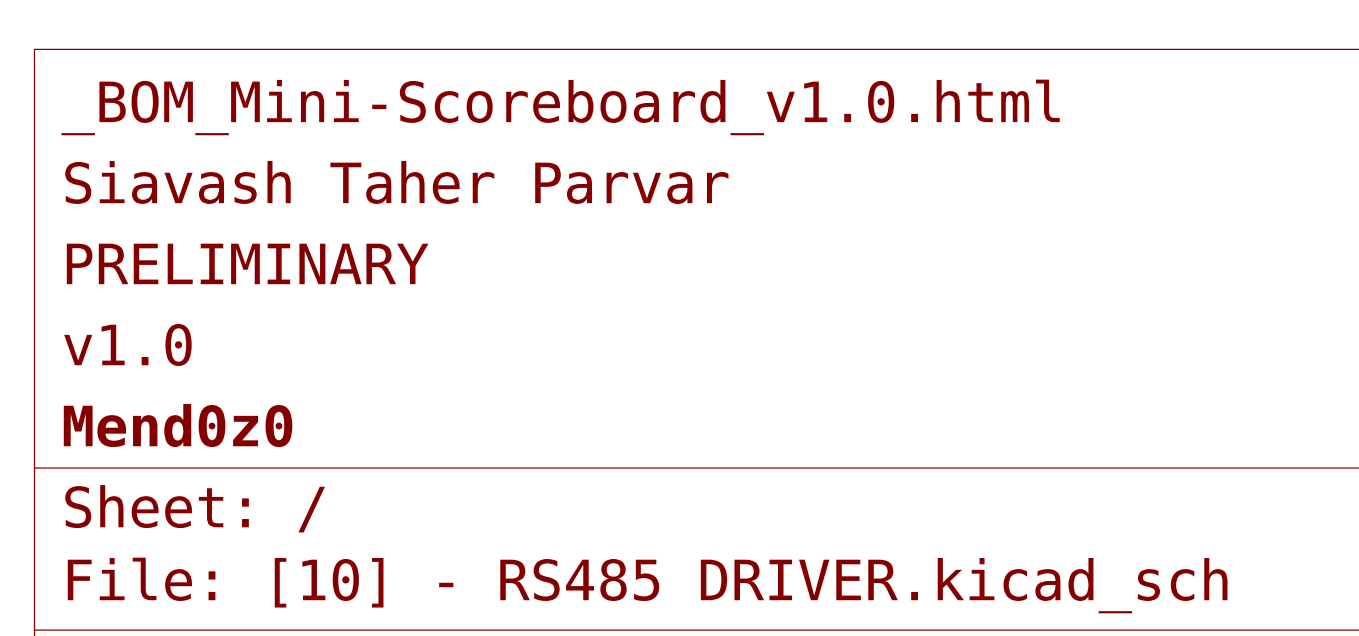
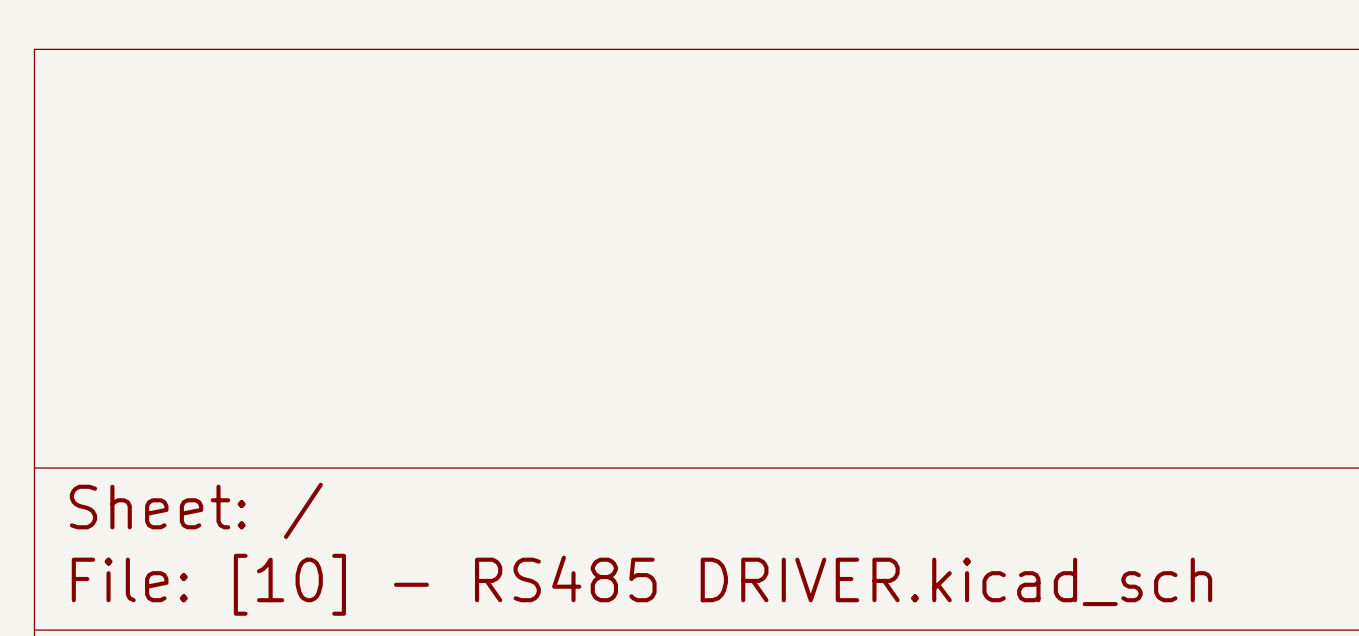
title block: _BOM_Mini-Scoreboard_v1.0.html (560, 107) -> none
title block: Siavash Taher Parvar (396, 182) -> none
title block: PRELIMINARY (247, 263) -> none
title block: v1.0 (127, 345) -> none
title block: Mend0z0 (178, 425) -> none

